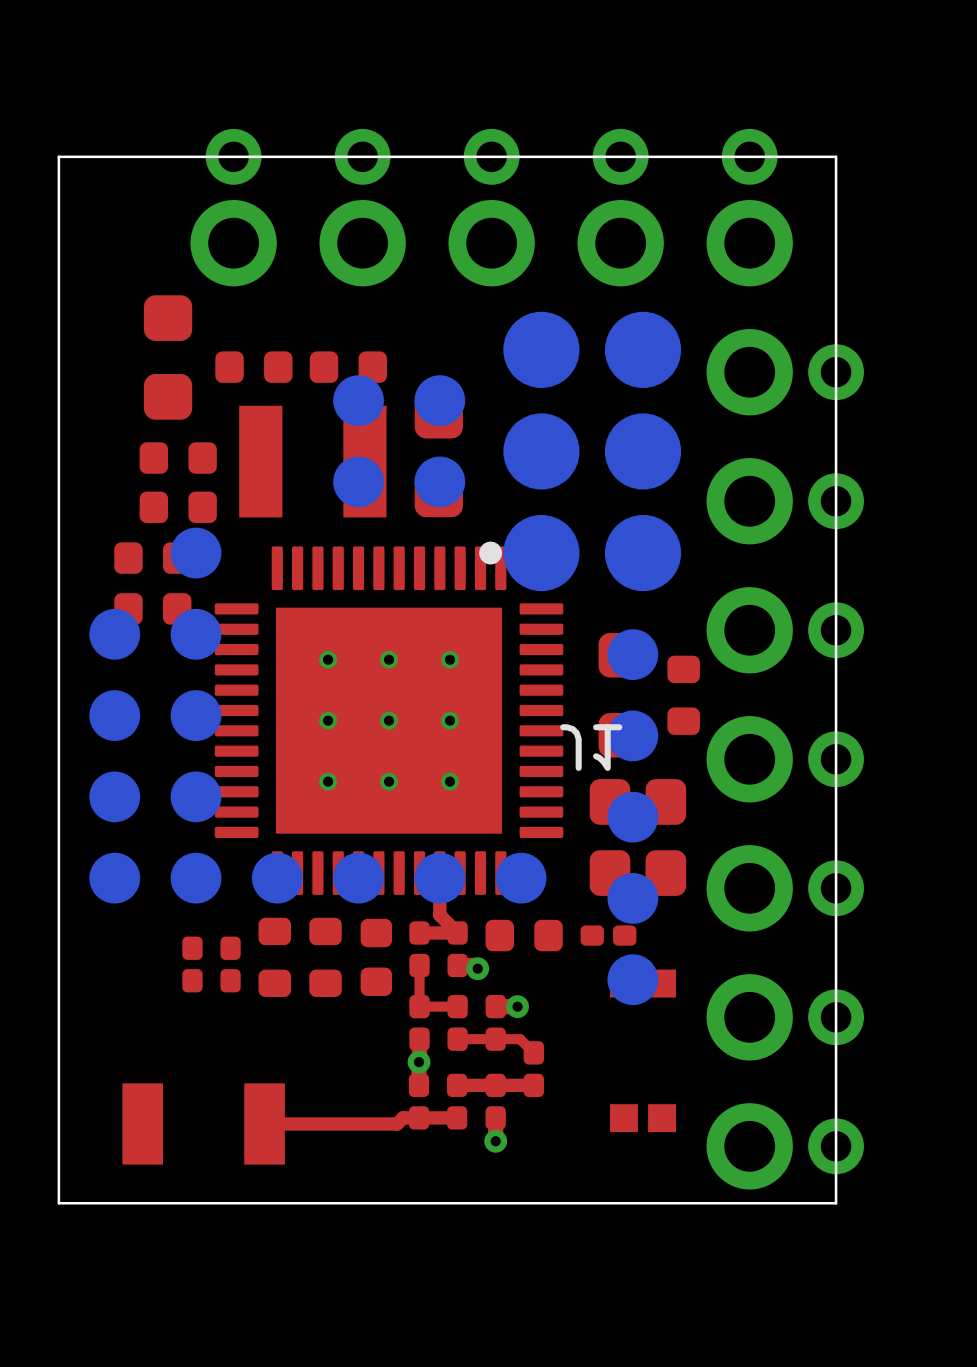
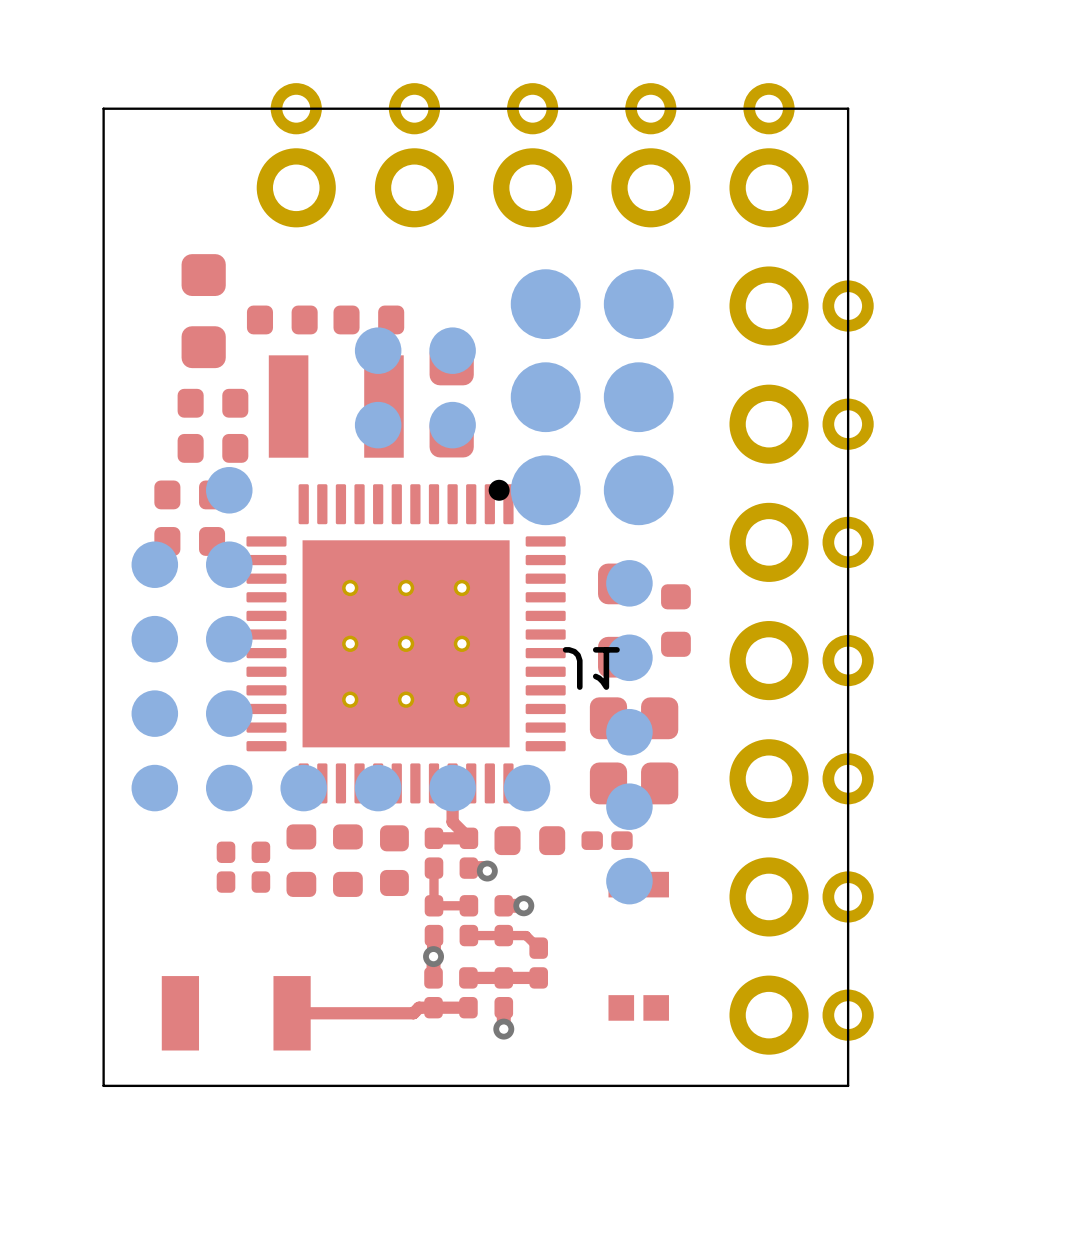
board edge: (58, 156) (836, 156) (836, 1203) -> (103, 127) (103, 108) (848, 108) (848, 1085) (815, 1085)
part position: (527, 659) -> (565, 568)

